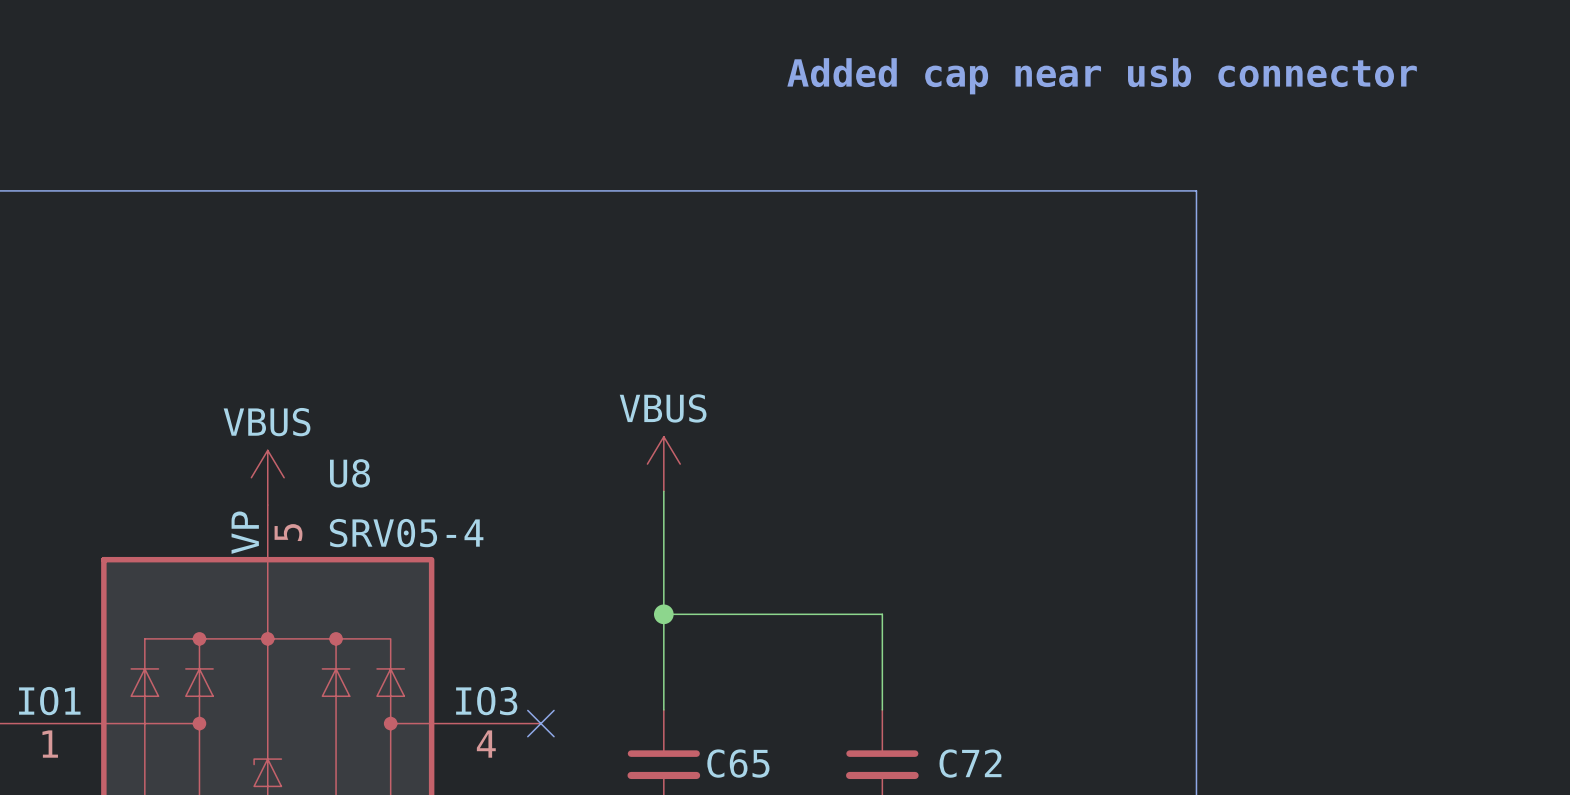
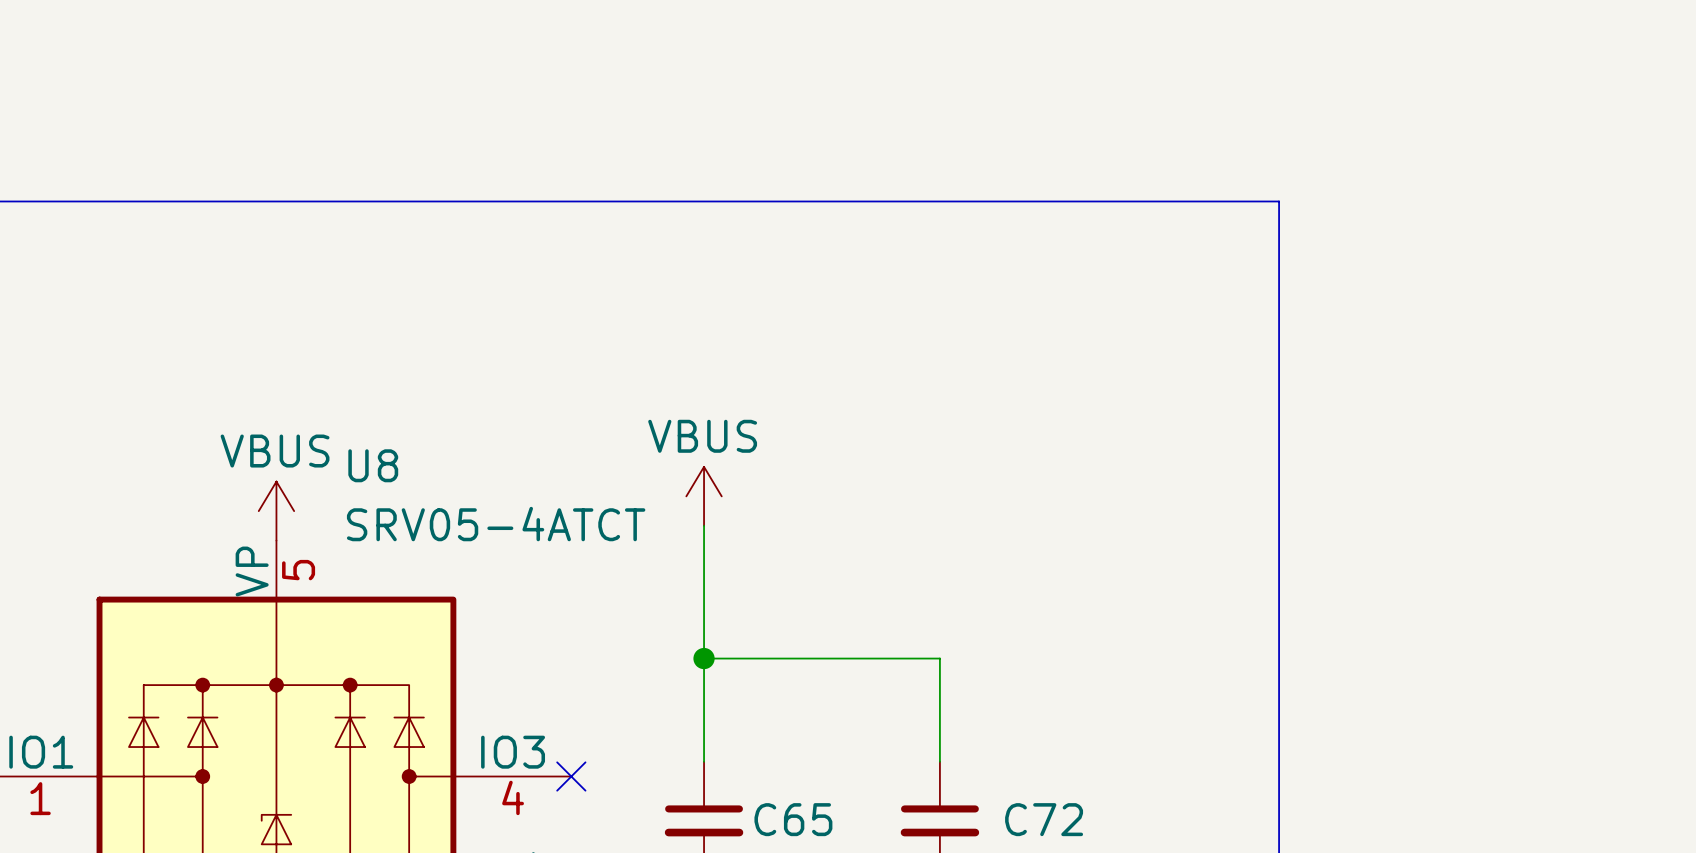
text: Added cap near usb connector (1102, 76) -> none
U8 name position: U8 (350, 473) -> U8 (373, 465)
U8 value: SRV05-4 (406, 533) -> SRV05-4ATCT (496, 524)

